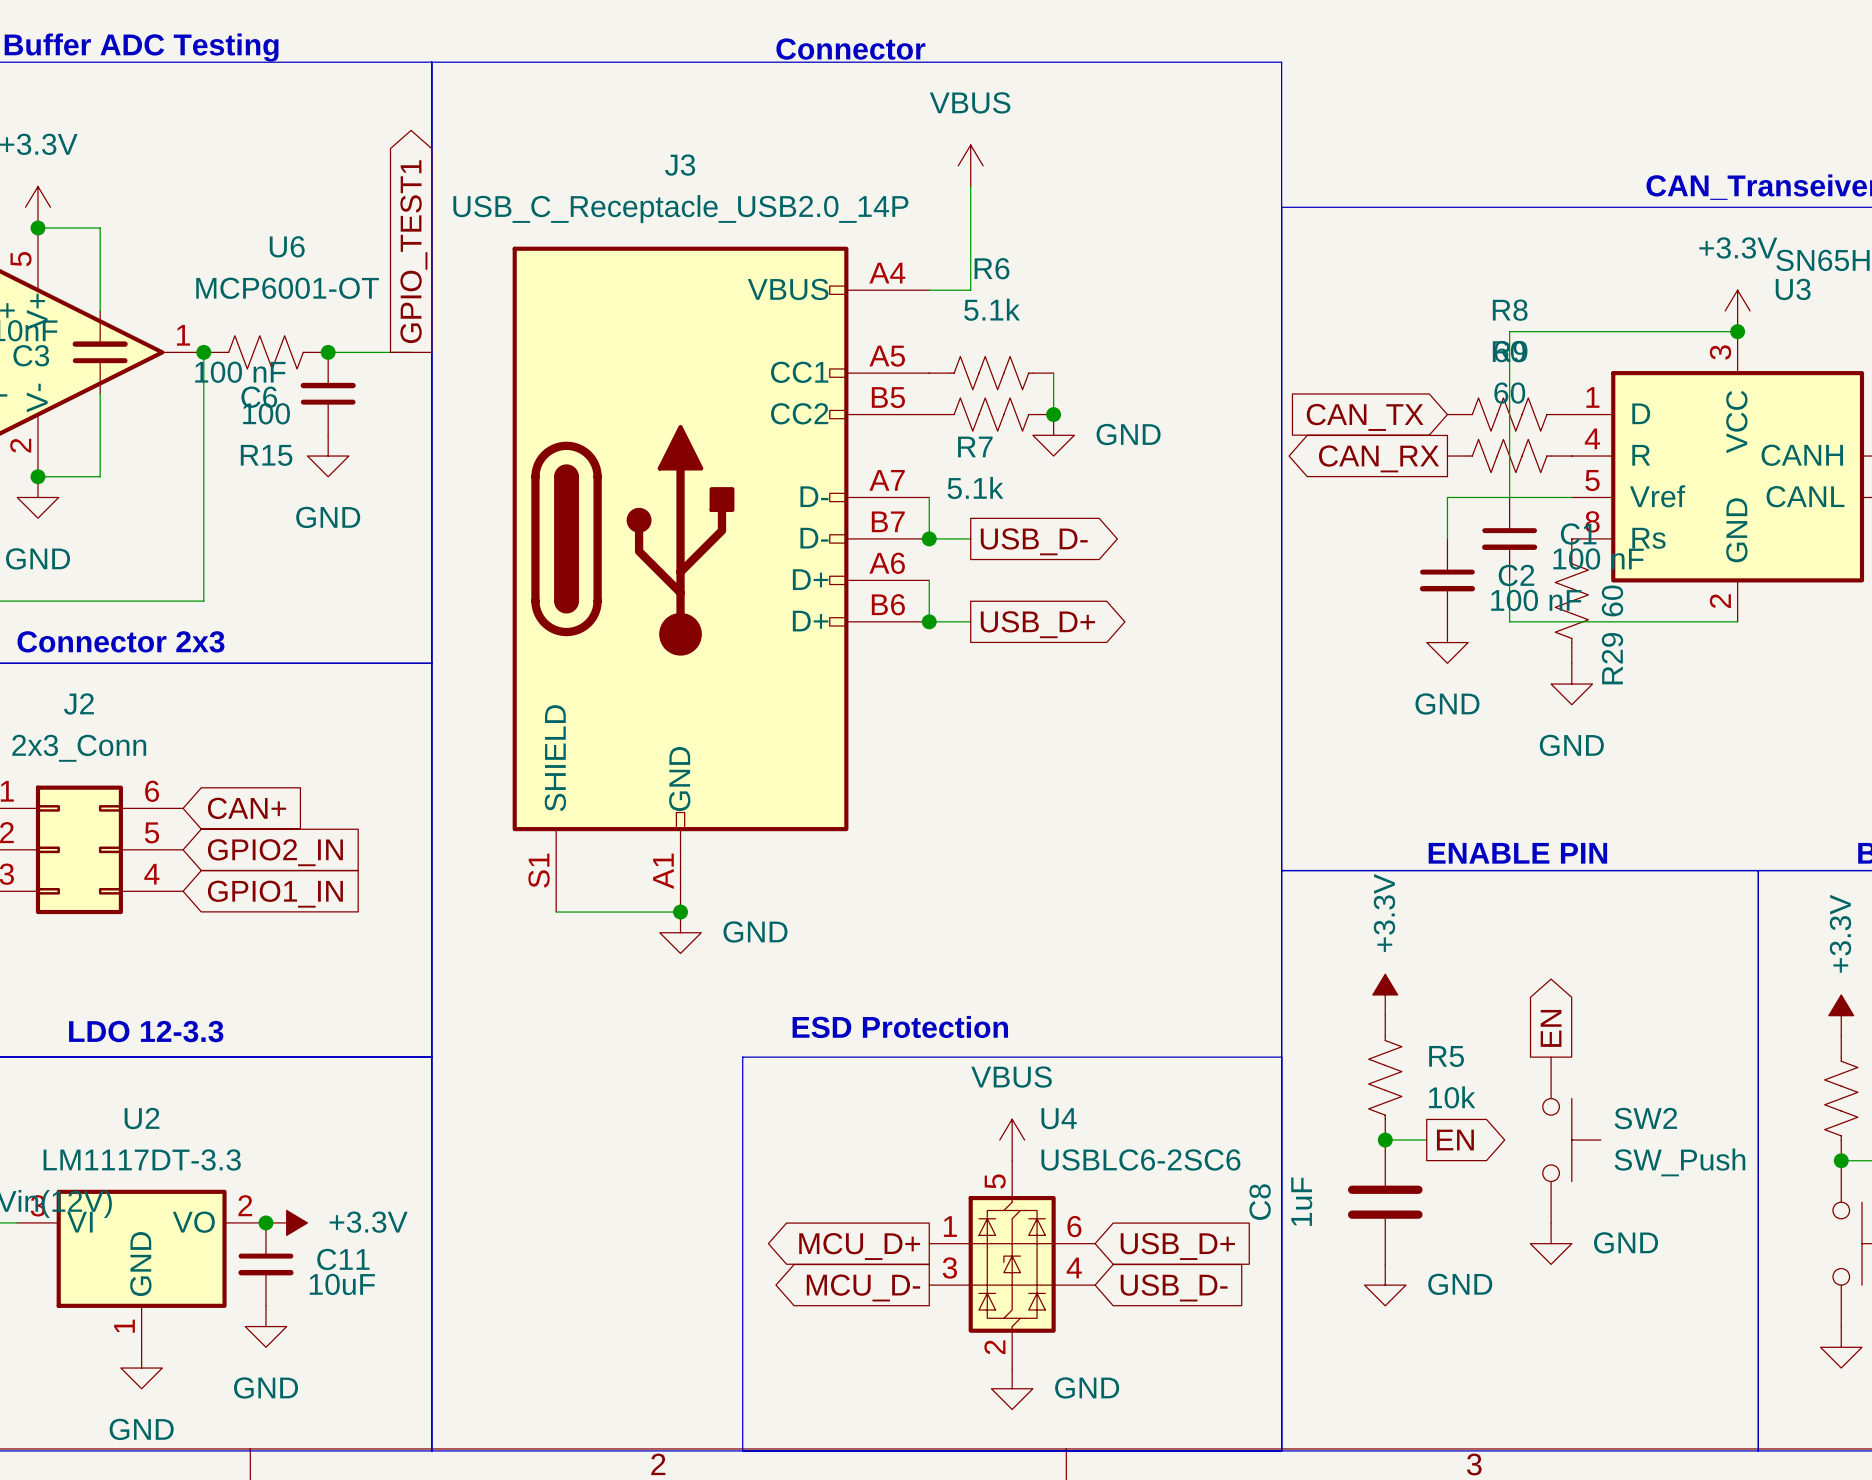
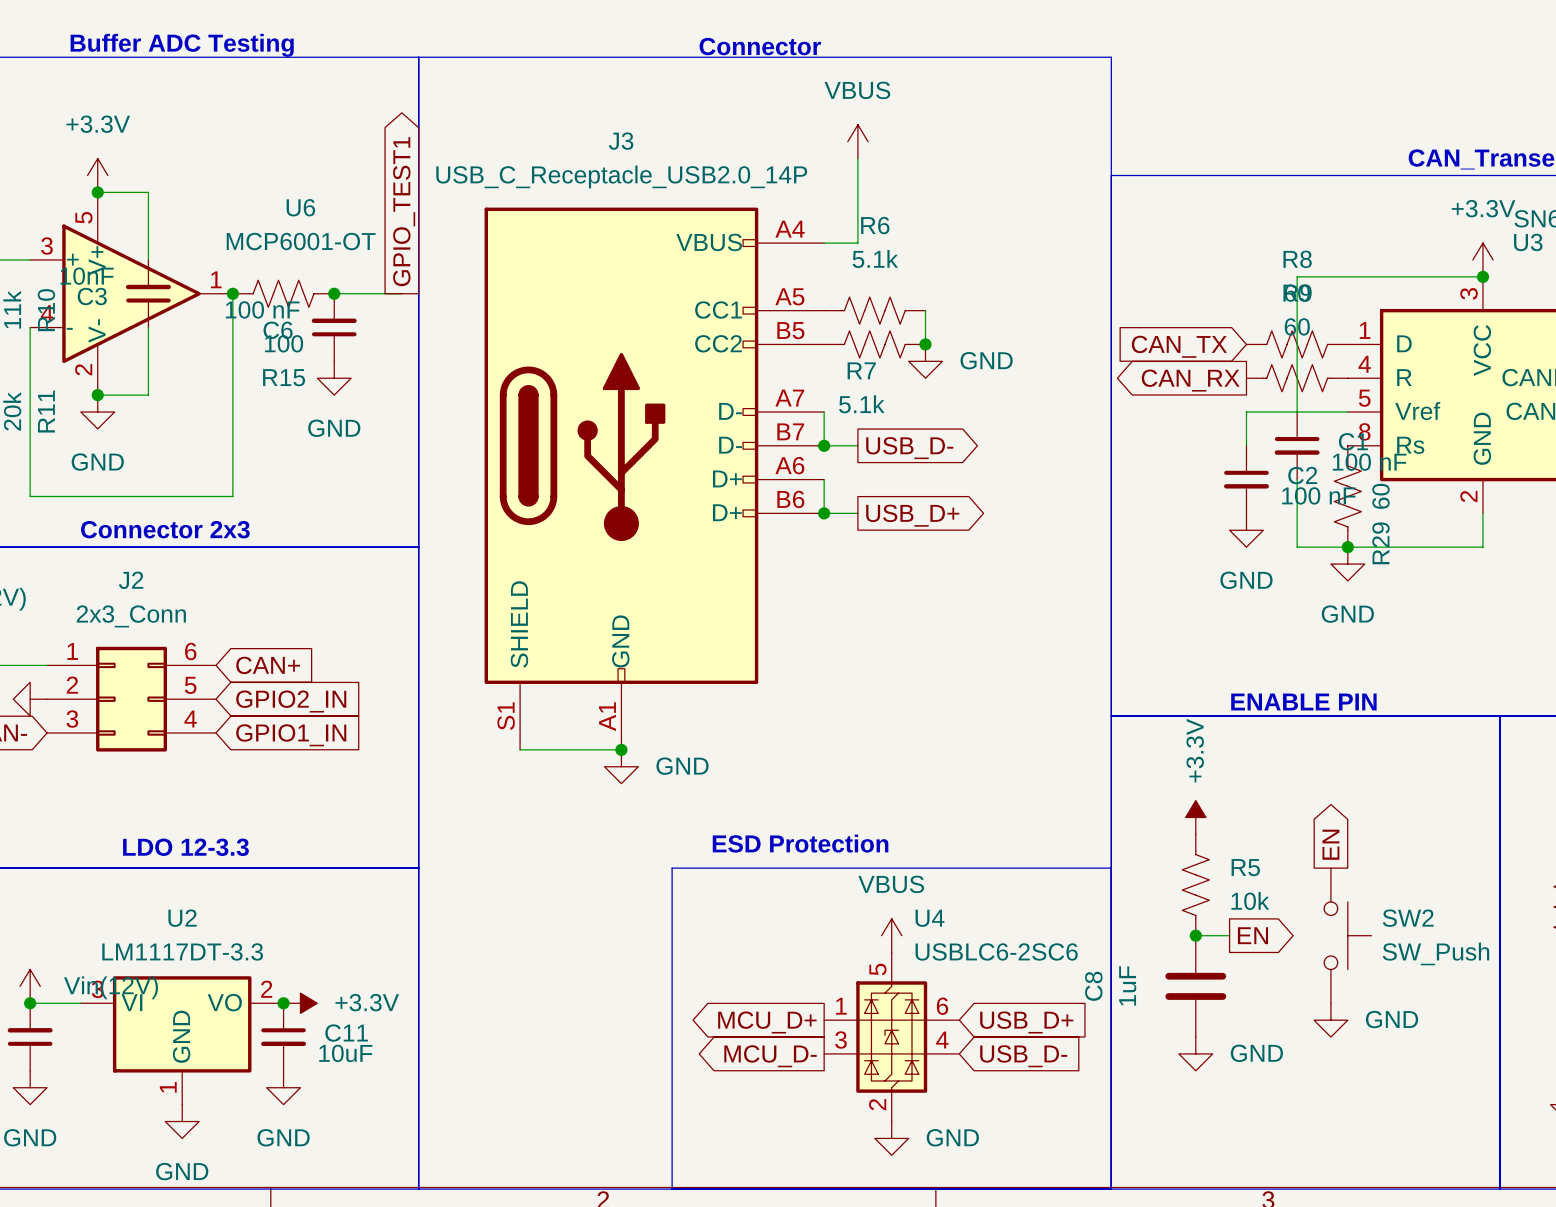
wire: (1509, 621) (1737, 621) -> (1297, 513) (1297, 547) (1482, 547) (1482, 513)
junction: none -> (1347, 547)

